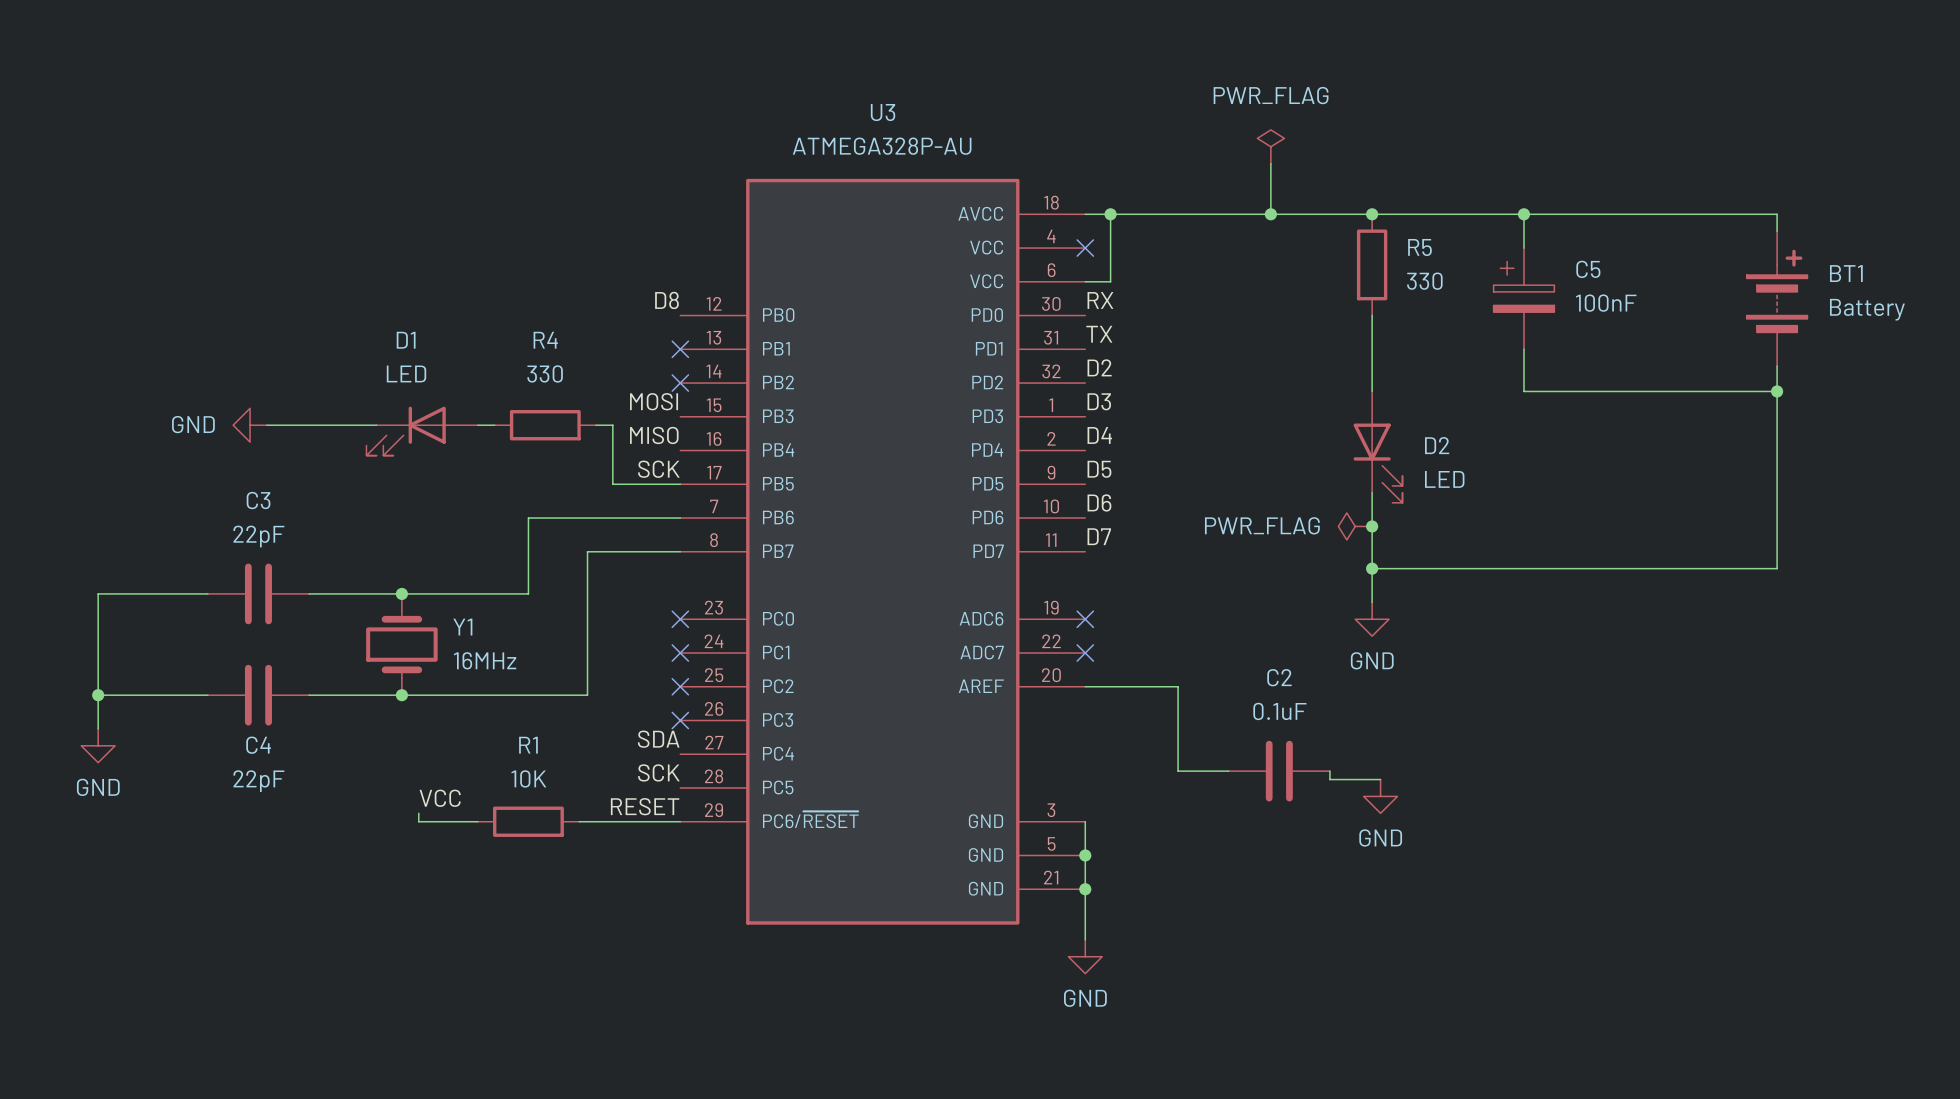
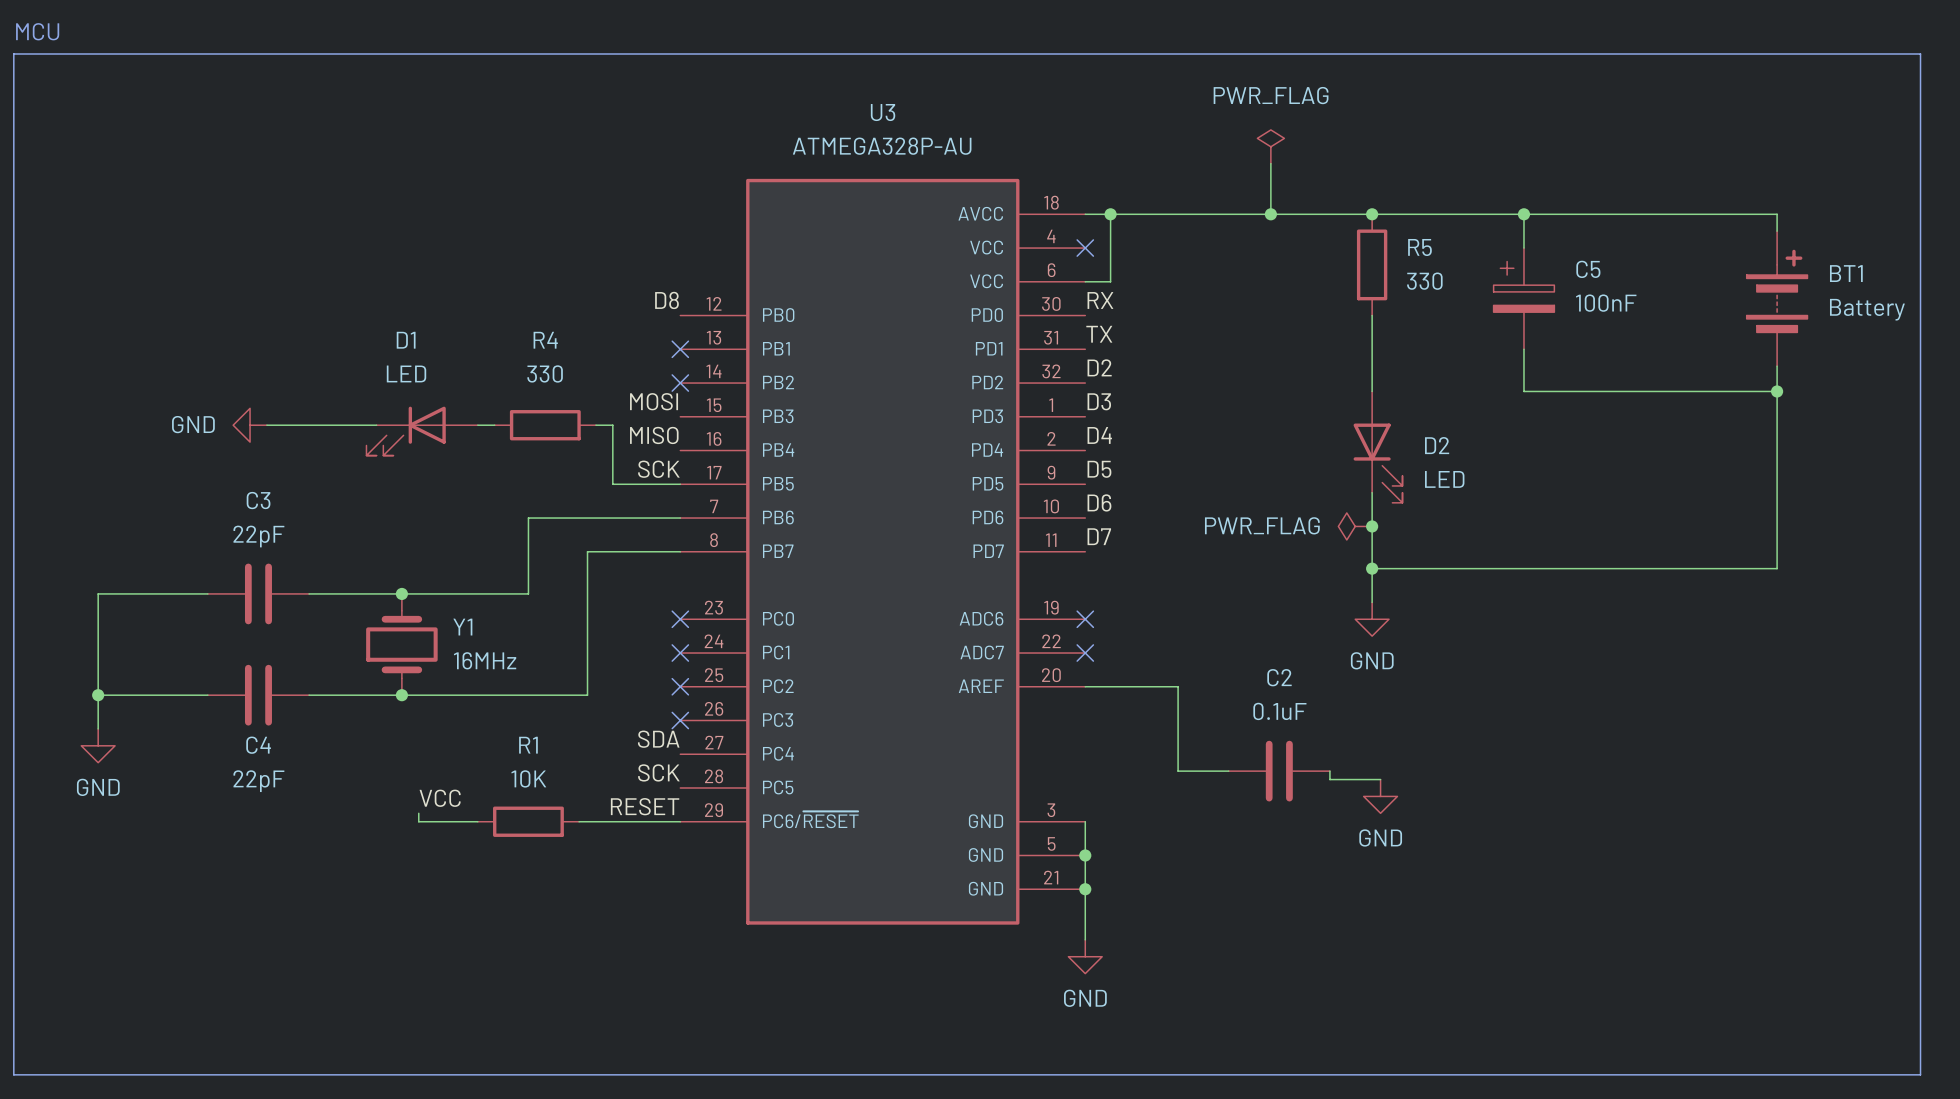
text: none -> MCU (37, 31)
line: none -> (13, 54) (13, 1074) (1920, 1074) (1920, 54) (13, 54)

